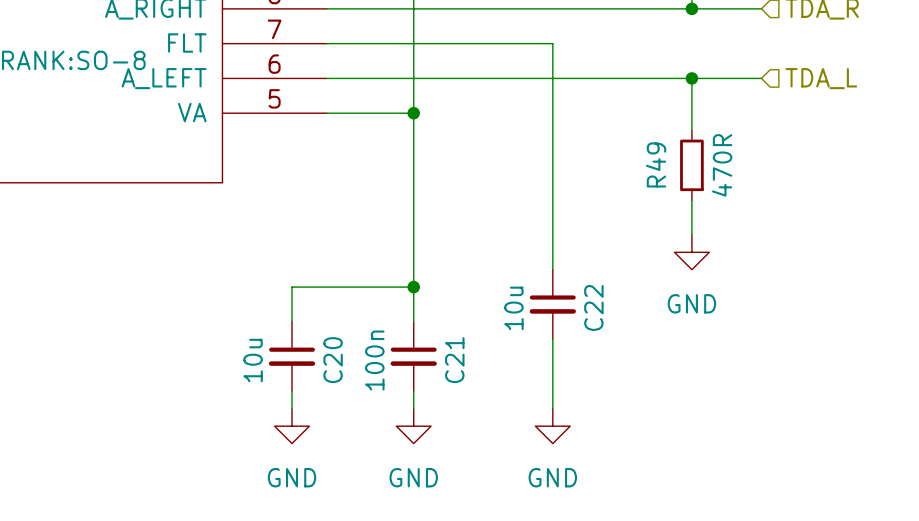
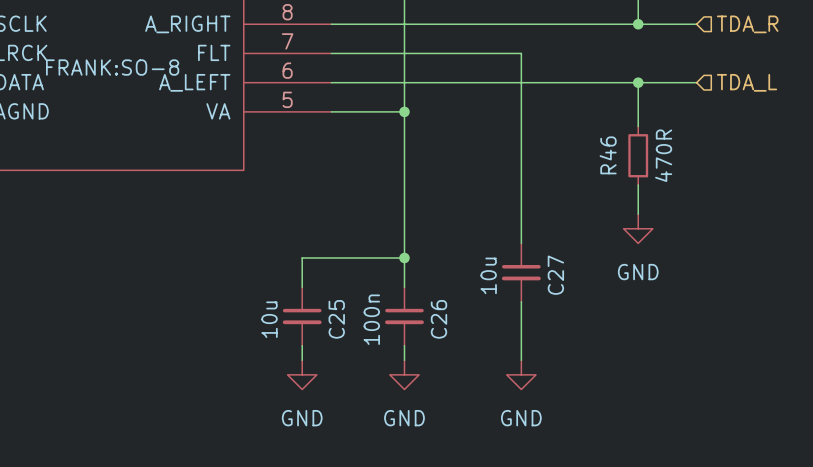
R49 name: R49 (656, 164) -> R46 (608, 155)
C22 name: C22 (593, 307) -> C27 (555, 275)
C20 name: C20 (333, 360) -> C25 (336, 319)
C21 name: C21 (454, 360) -> C26 (438, 319)

